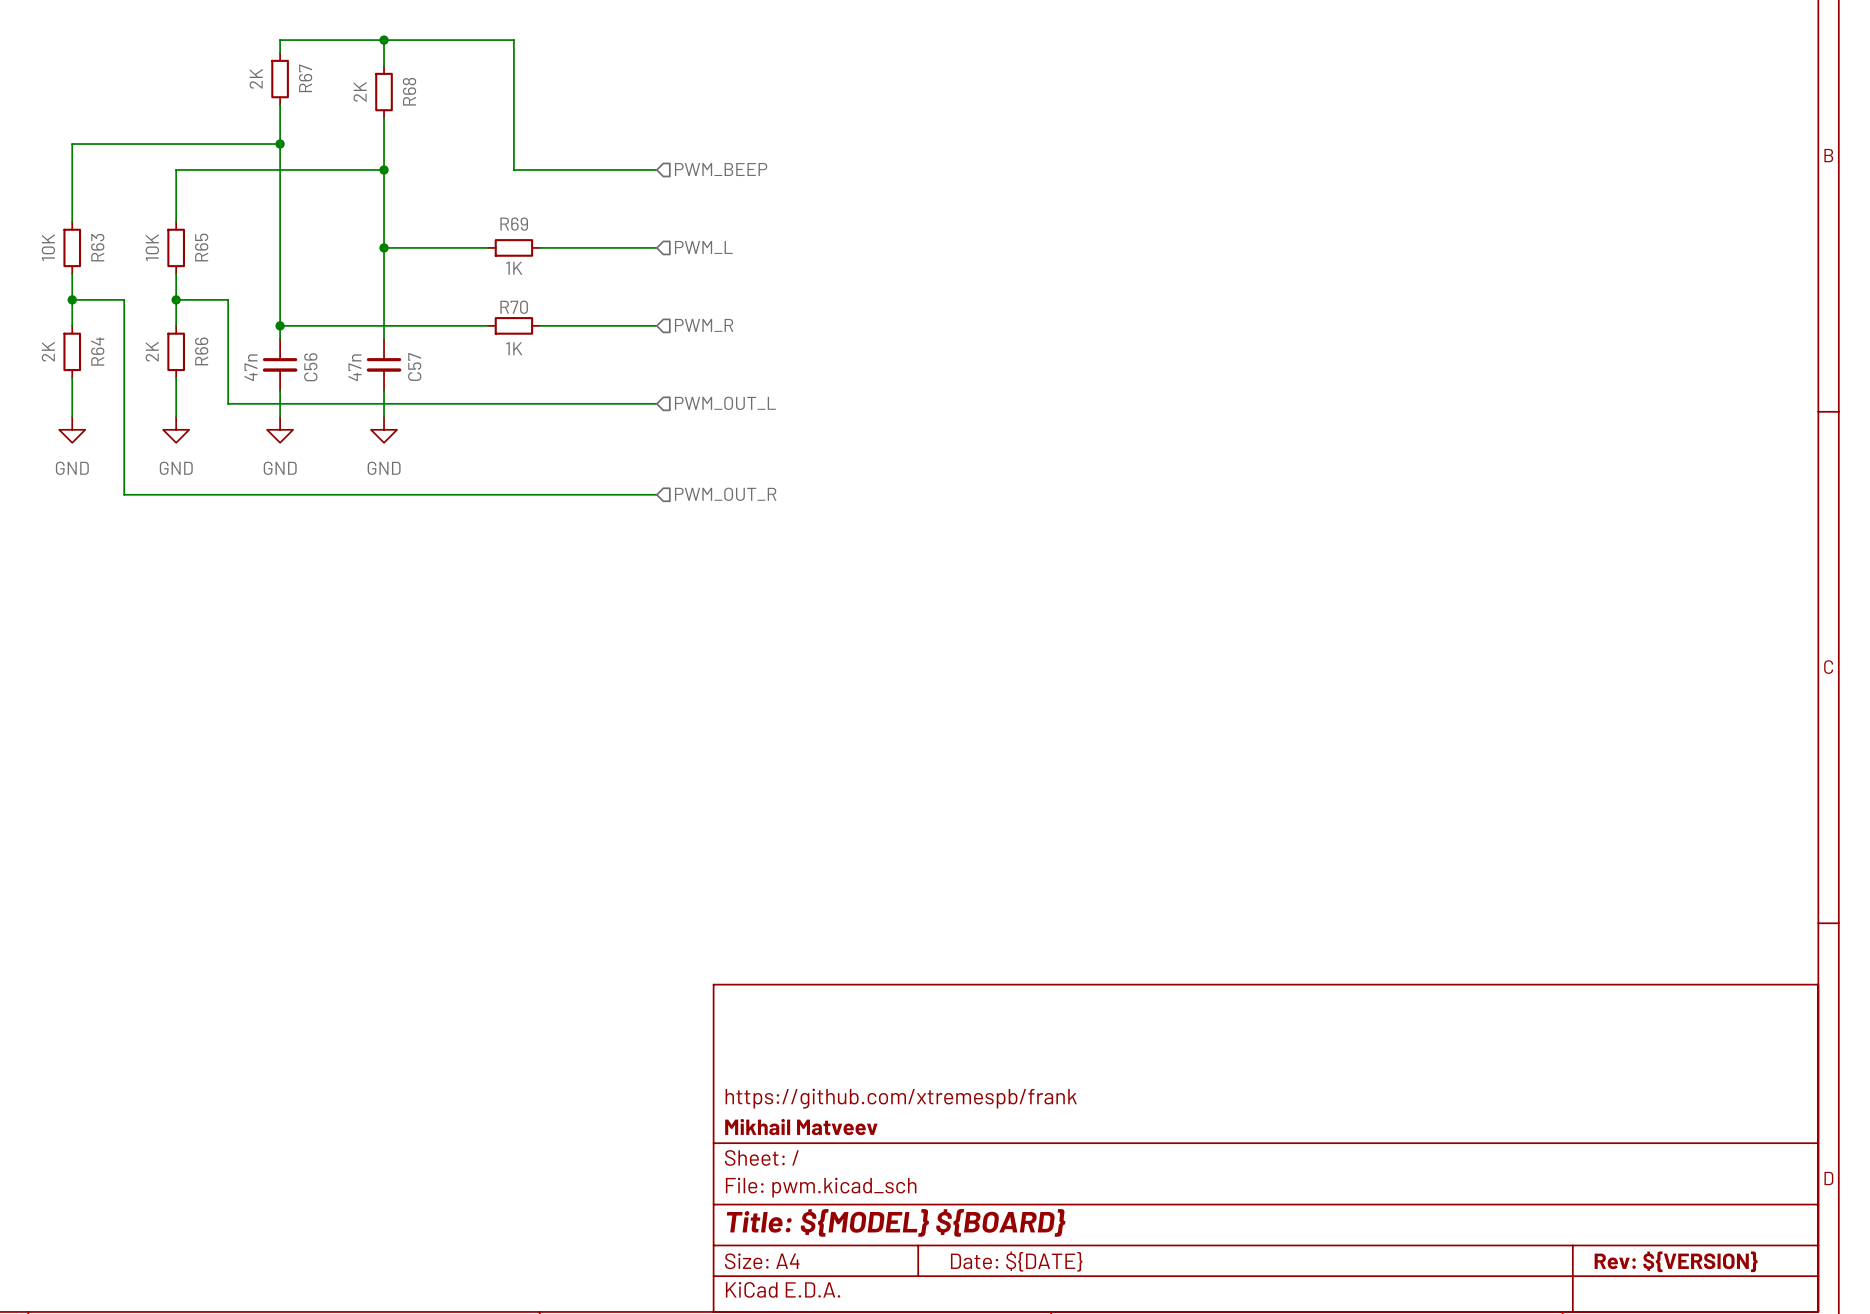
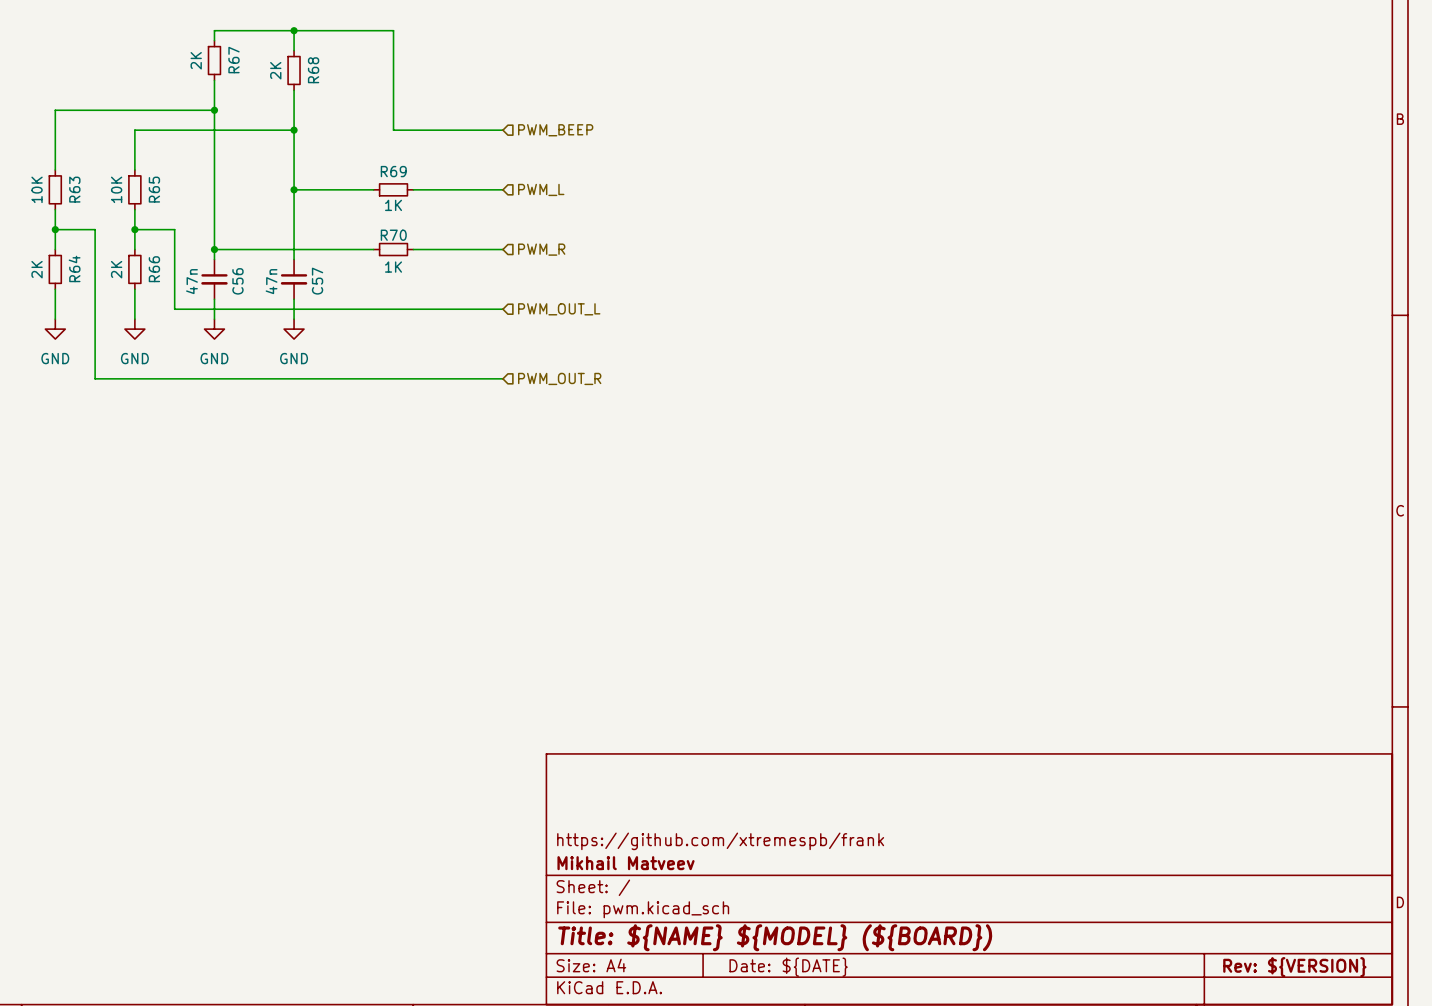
title block: Title: ${MODEL} ${BOARD} (896, 1222) -> Title: ${NAME} ${MODEL} (${BOARD}) (775, 937)

